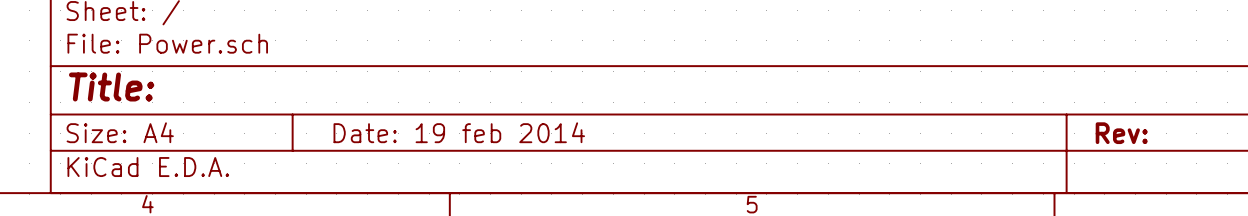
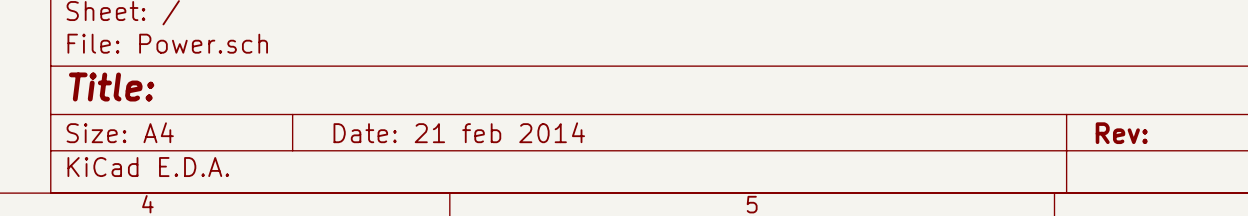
title block: Date: 19 feb 2014 (459, 132) -> Date: 21 feb 2014 (459, 132)

